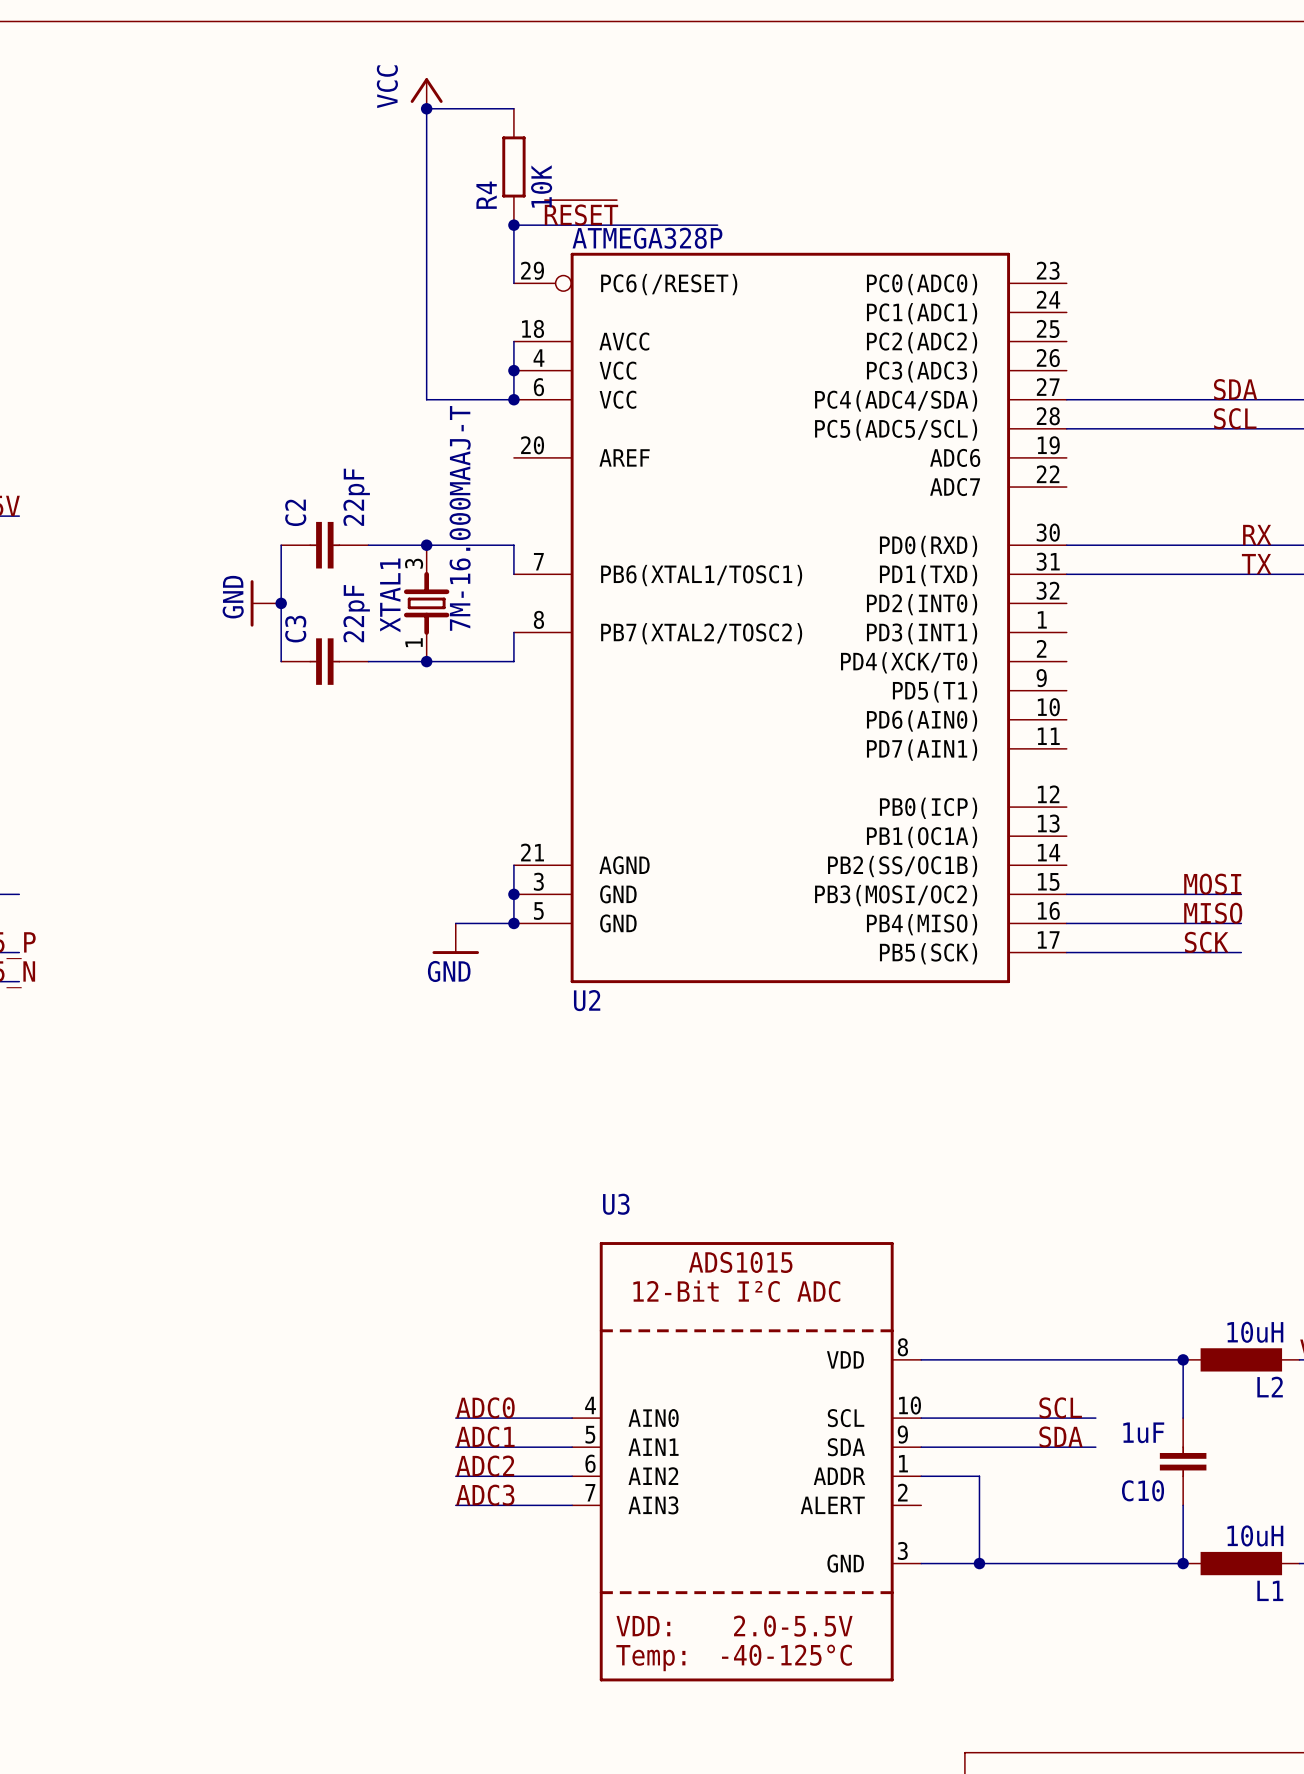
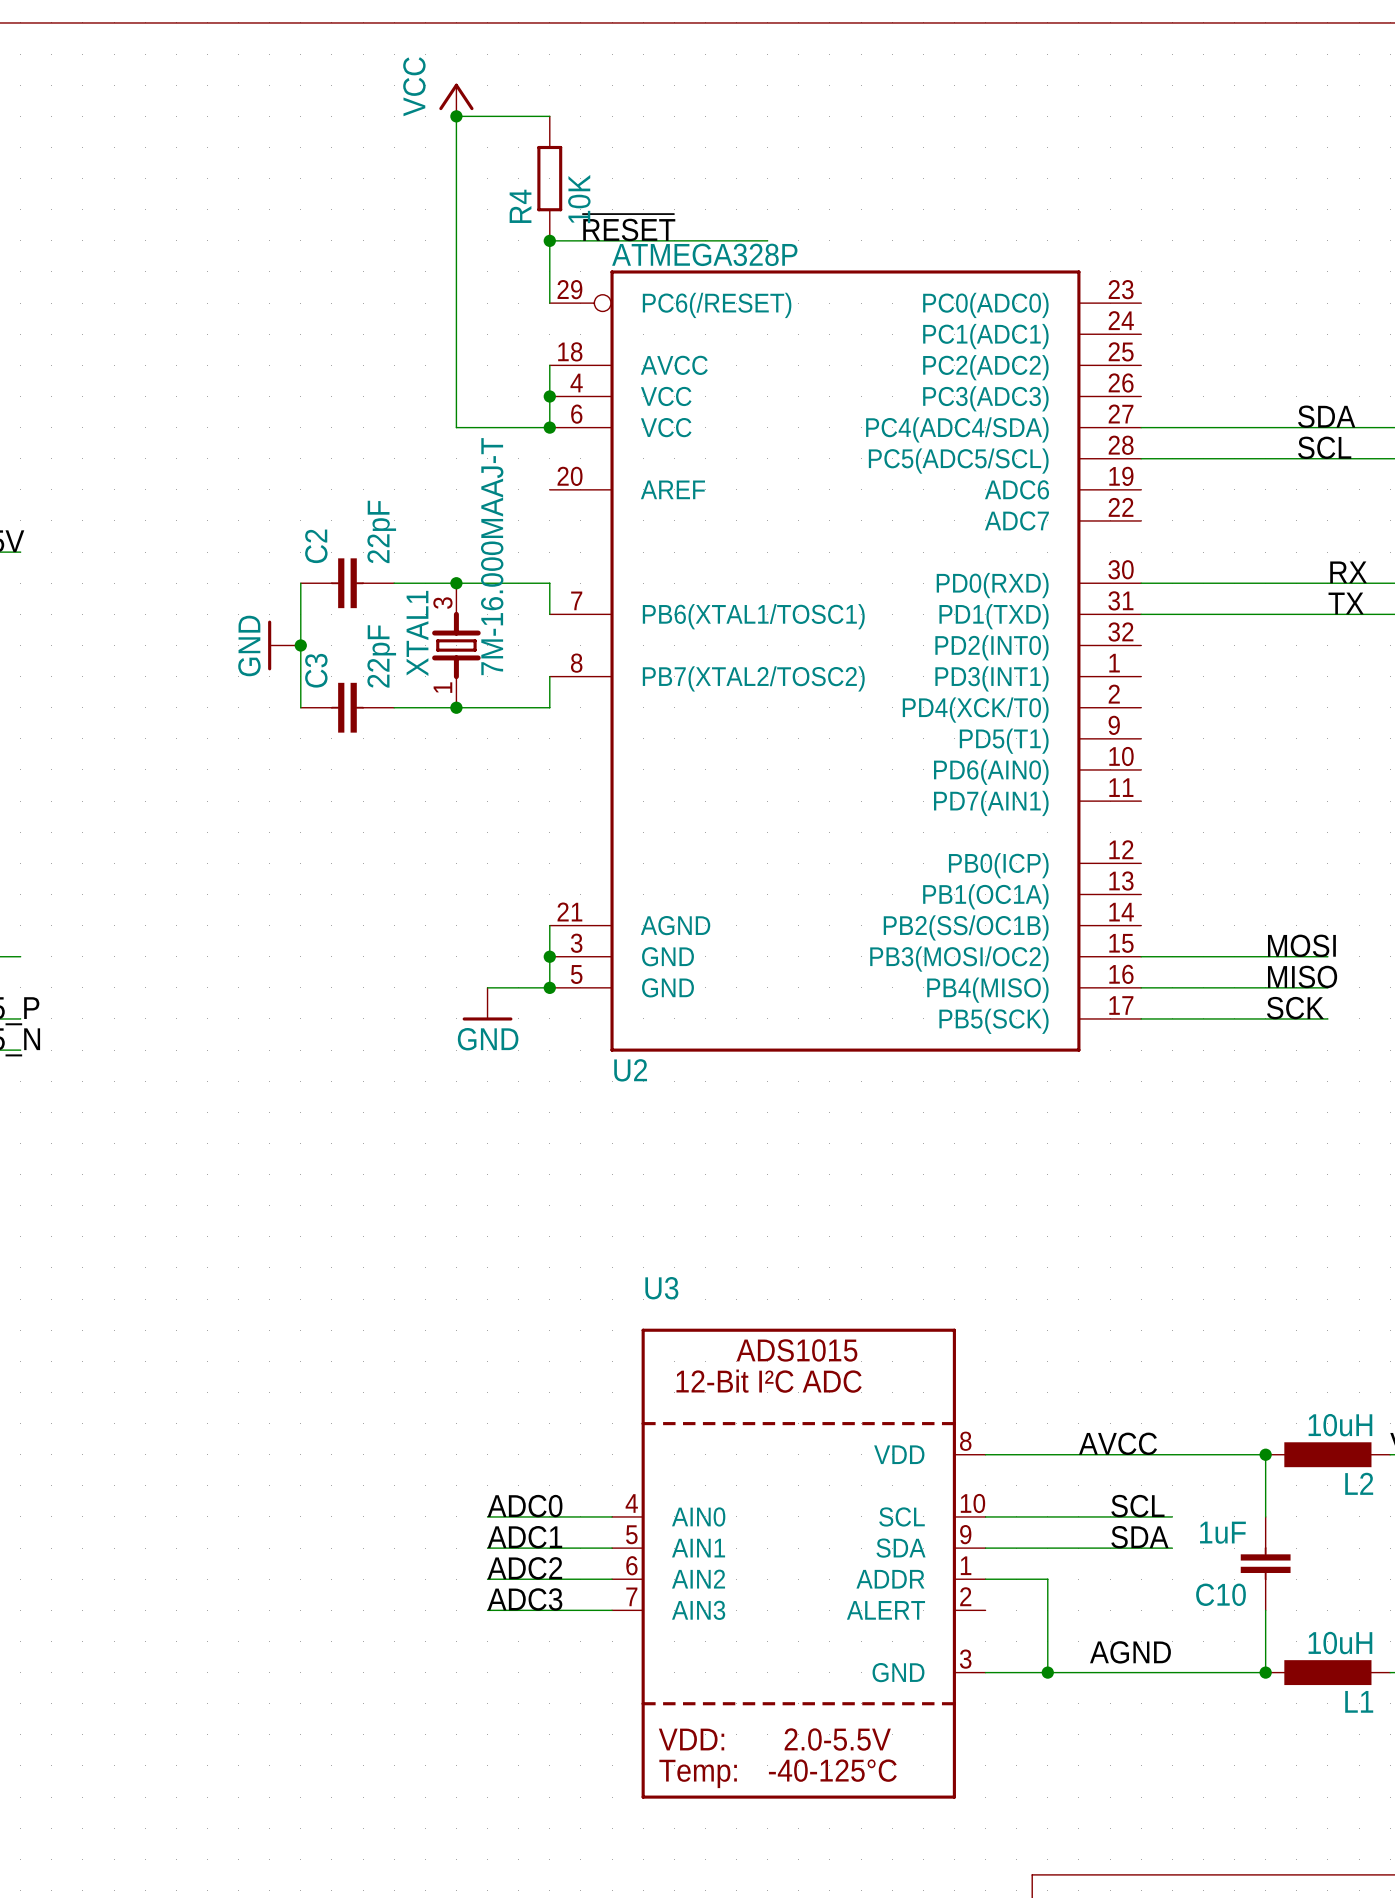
label: none -> AVCC (1117, 1443)
label: none -> AGND (1130, 1652)

